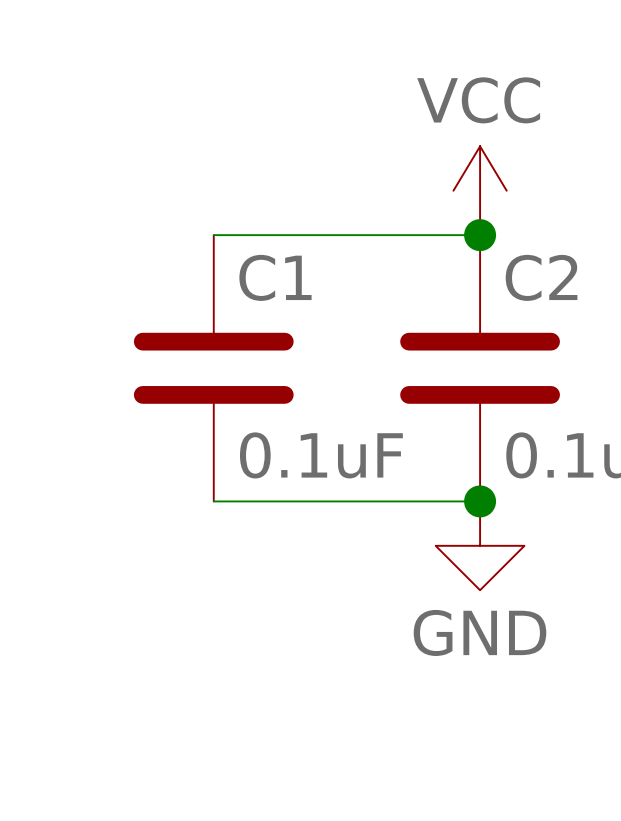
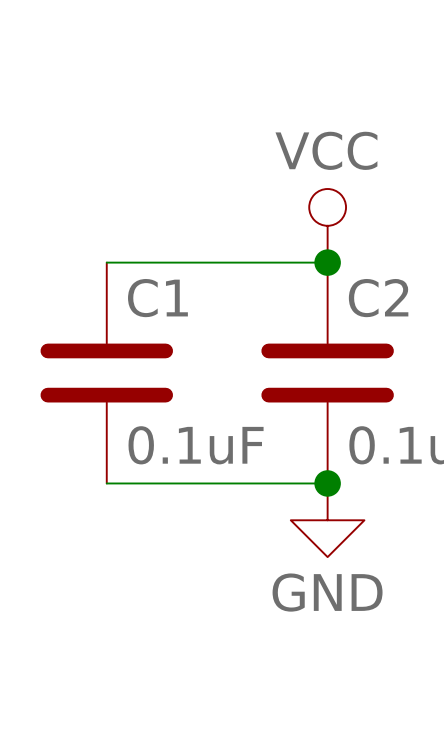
power symbol shape: [453, 146, 507, 236] -> [309, 188, 347, 263]

